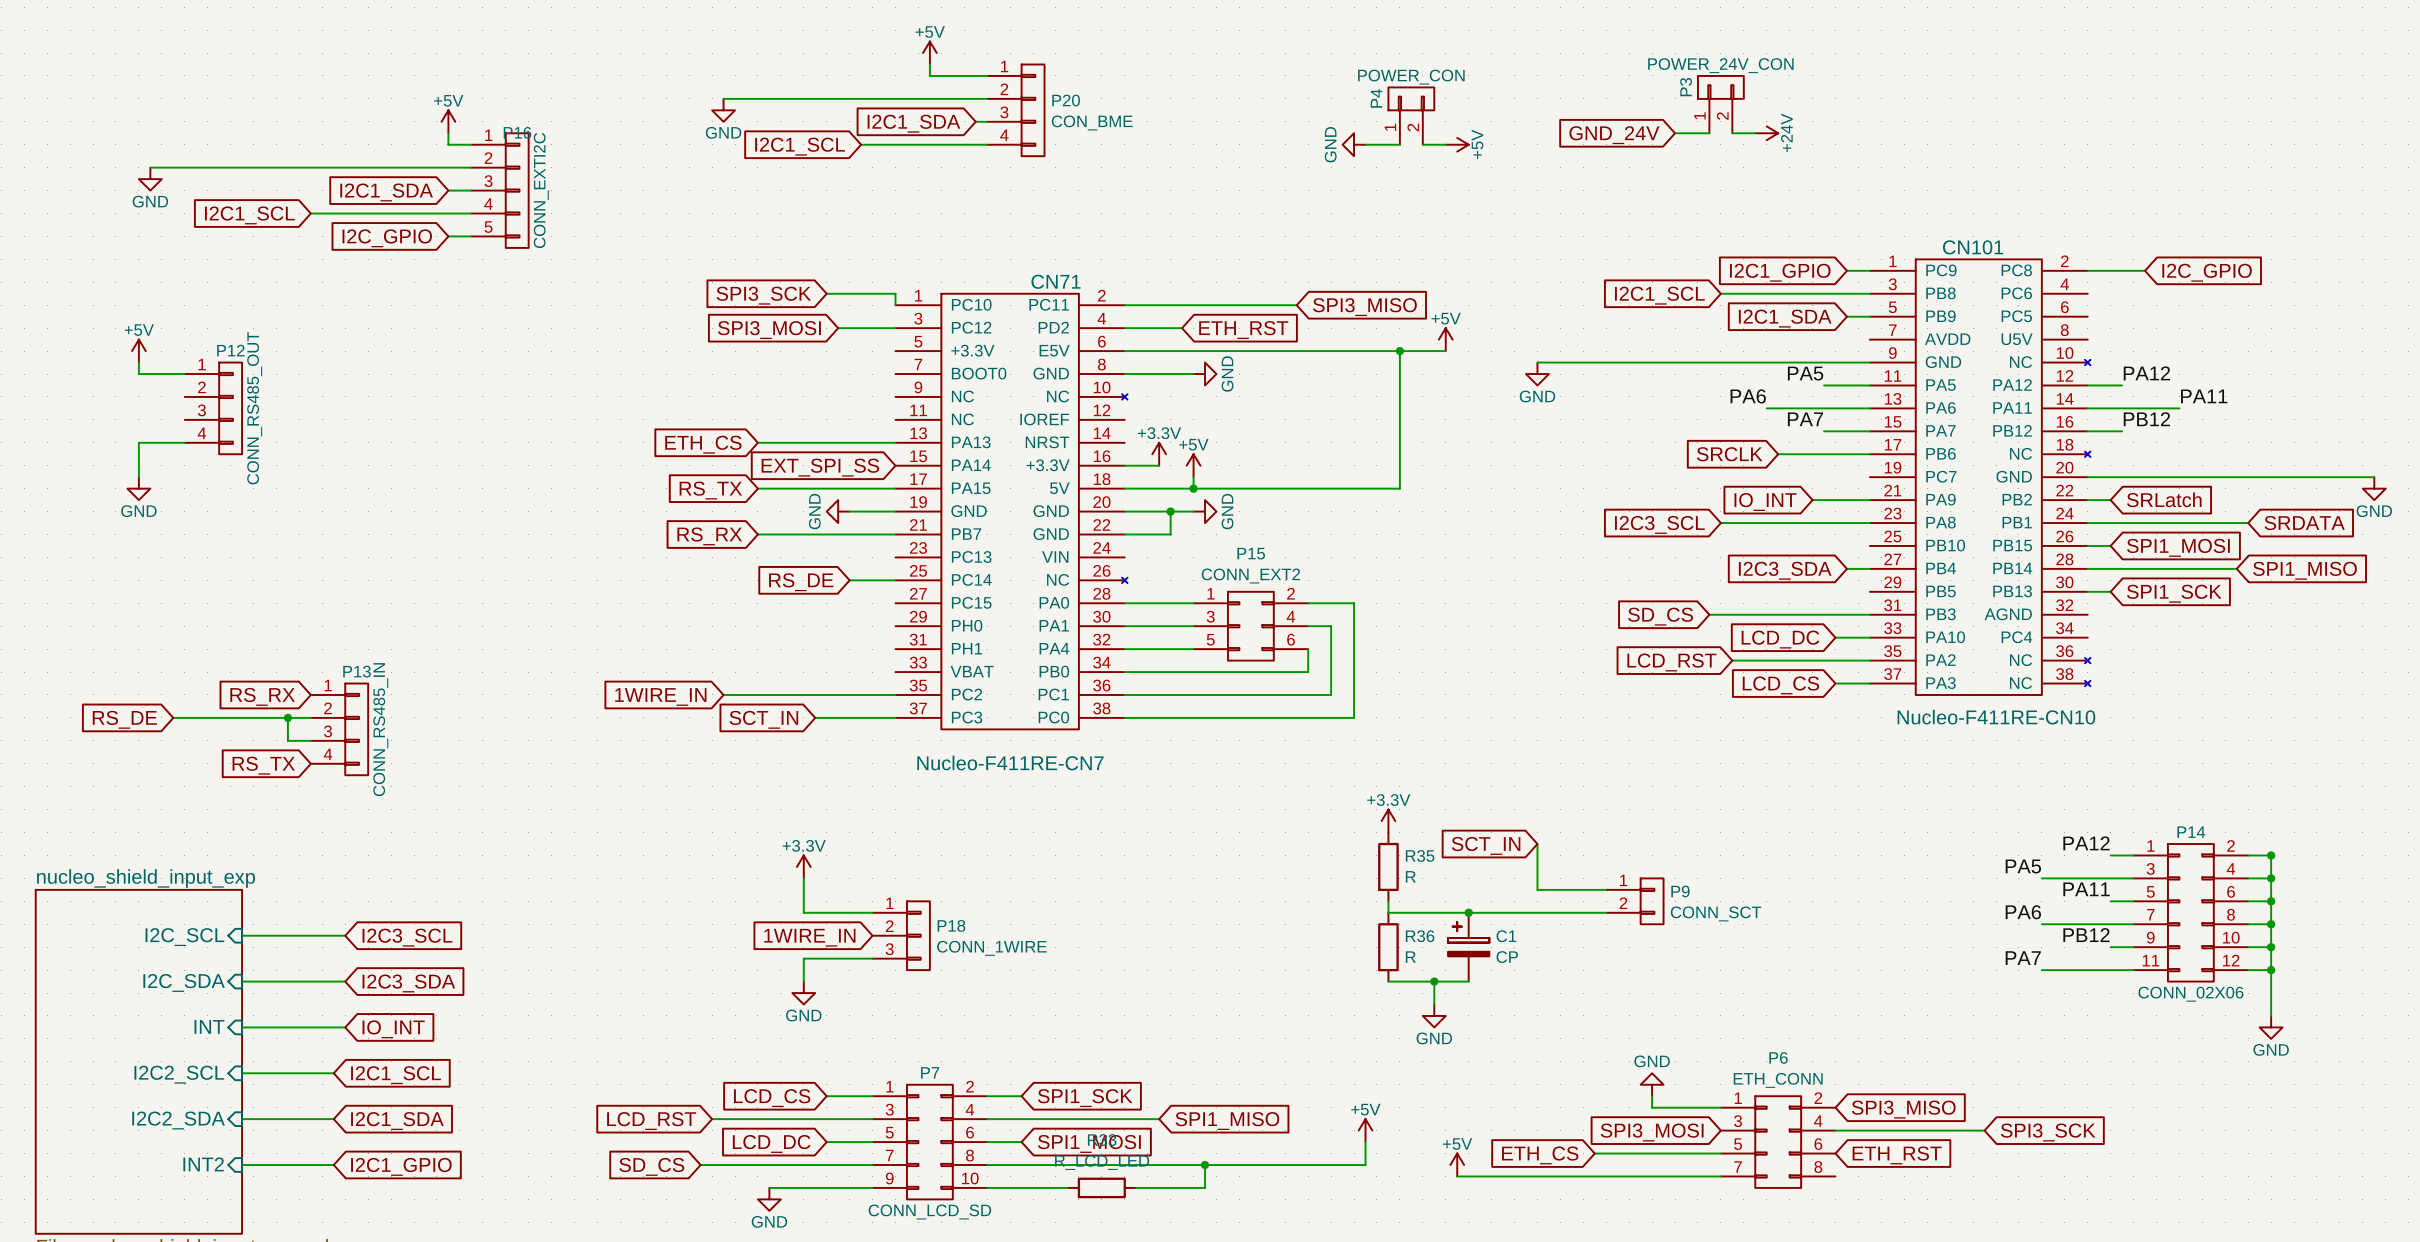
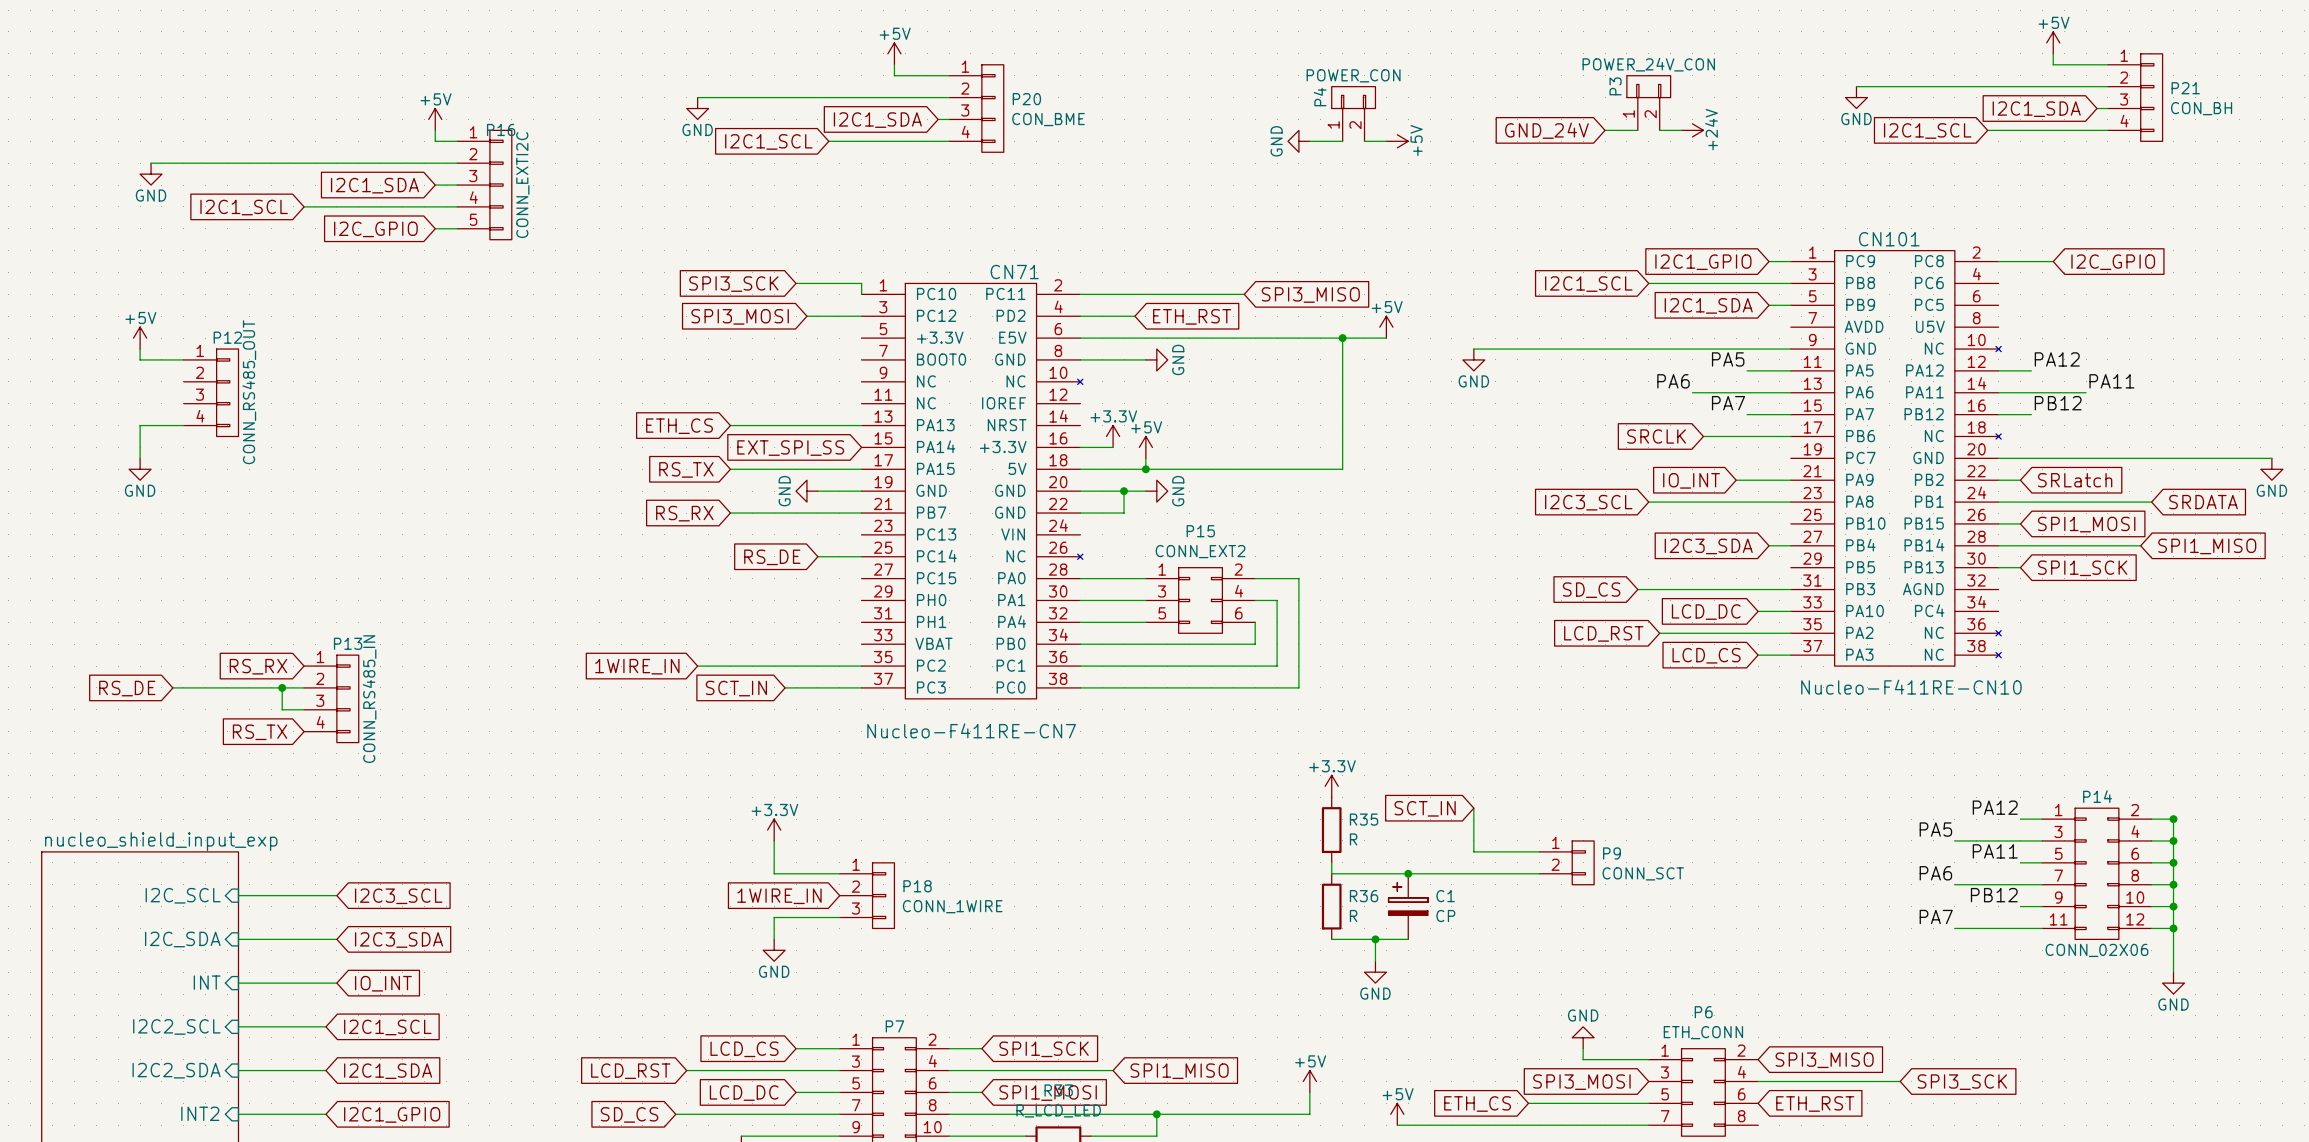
power symbol: none -> +5V (2053, 42)
wire: none -> (2053, 53) (2053, 64) (2107, 64)
wire: none -> (1856, 86) (2107, 86)
power symbol: none -> GND (1856, 97)
P21: none -> CON_BH (2135, 97)
wire: none -> (2096, 108) (2107, 108)
global label: none -> I2C1_SDA (2036, 109)
wire: none -> (1987, 130) (2107, 130)
global label: none -> I2C1_SCL (1927, 131)

